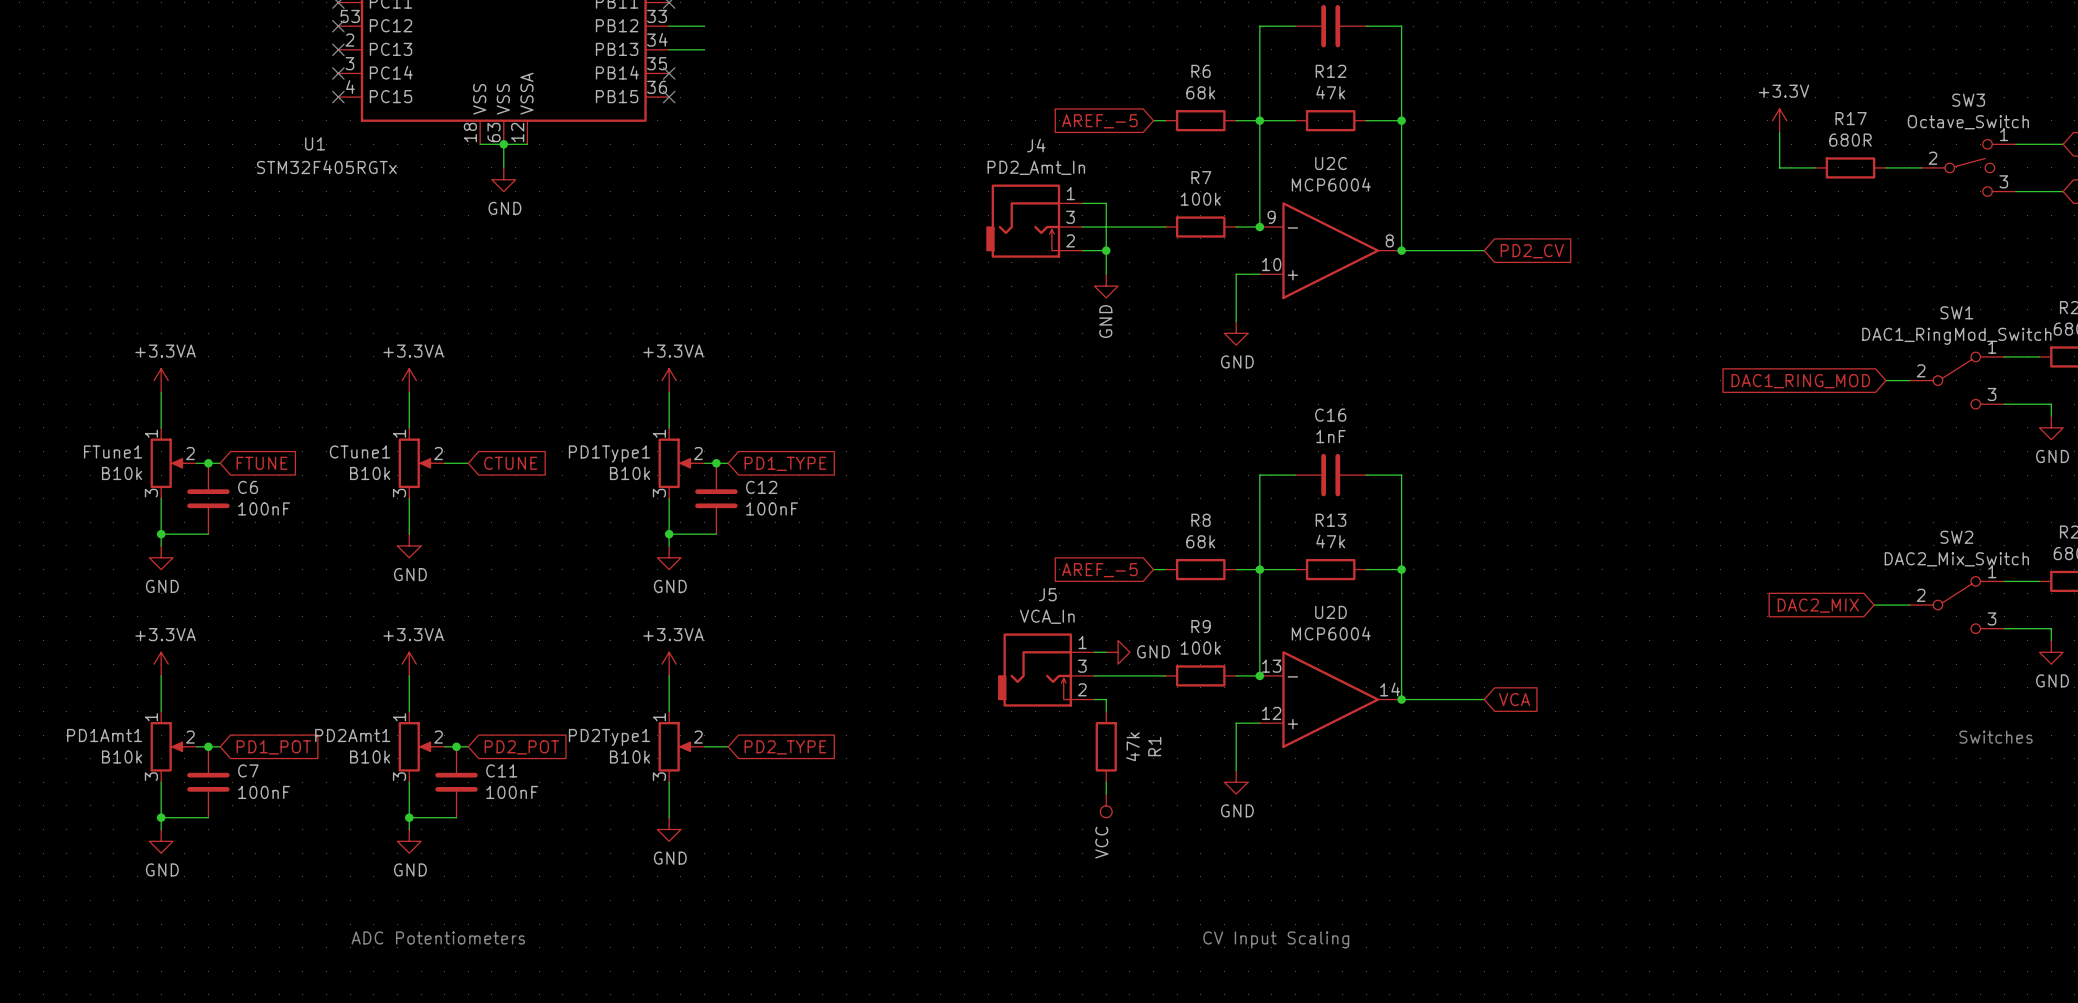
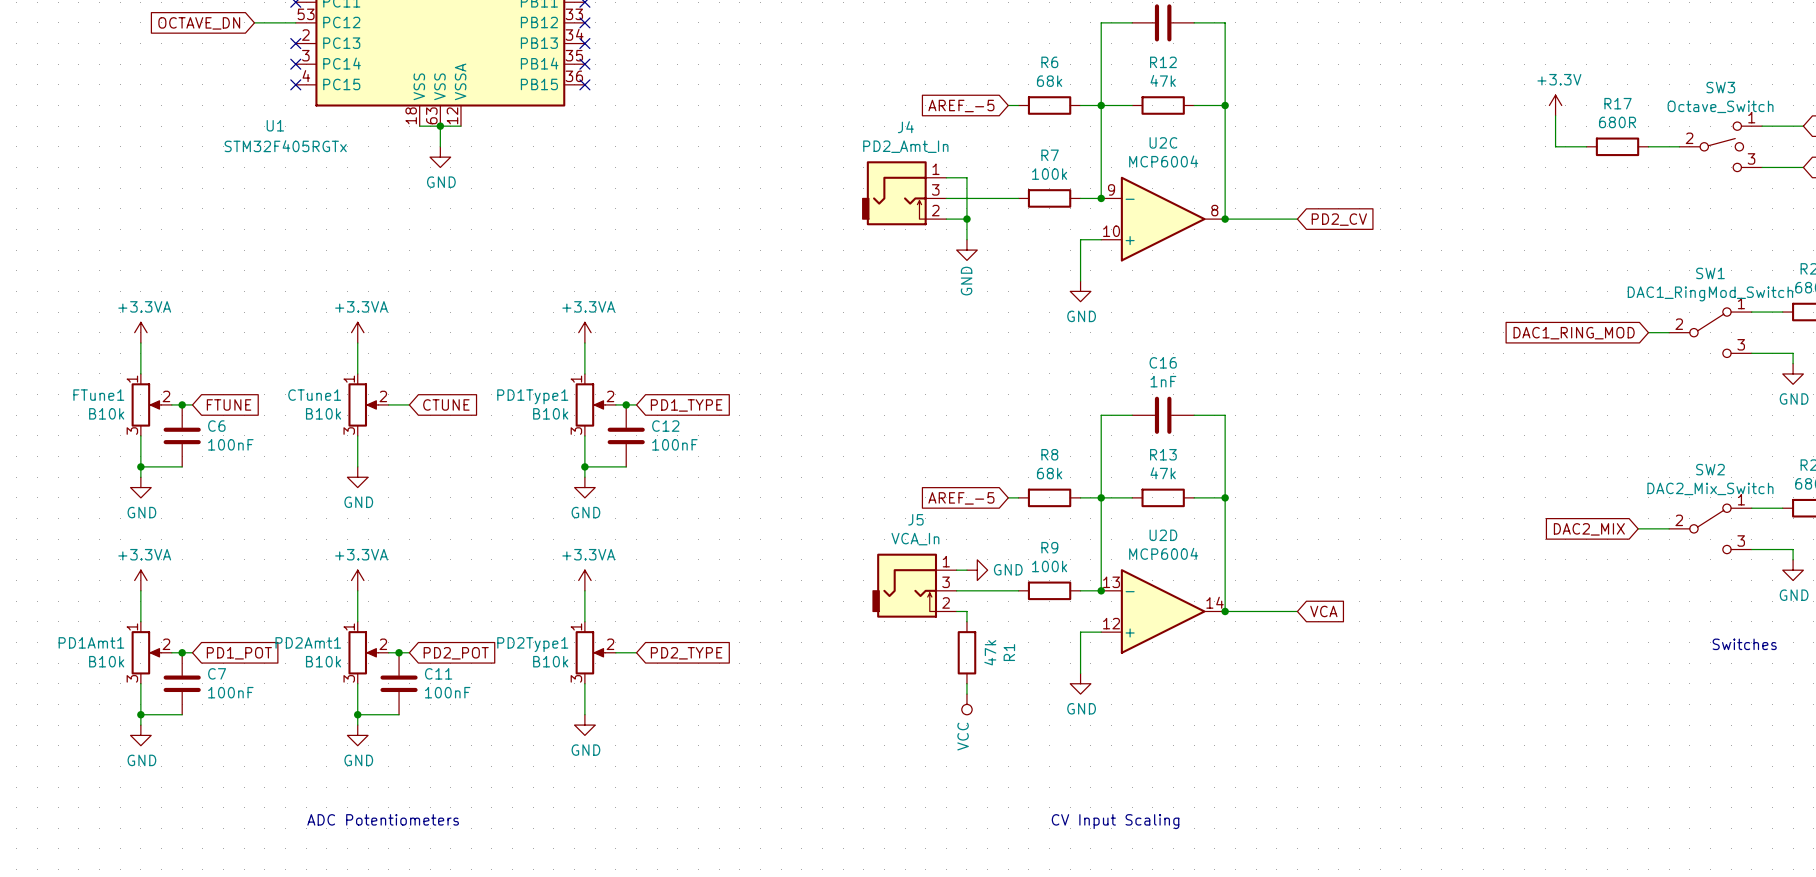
global label: none -> OCTAVE_DN (199, 23)
wire: none -> (254, 22) (295, 22)
no-connect mark: (338, 26) -> none
wire: (669, 26) (704, 26) -> none
no-connect mark: none -> (584, 22)
wire: (669, 49) (704, 49) -> none
no-connect mark: none -> (584, 43)

